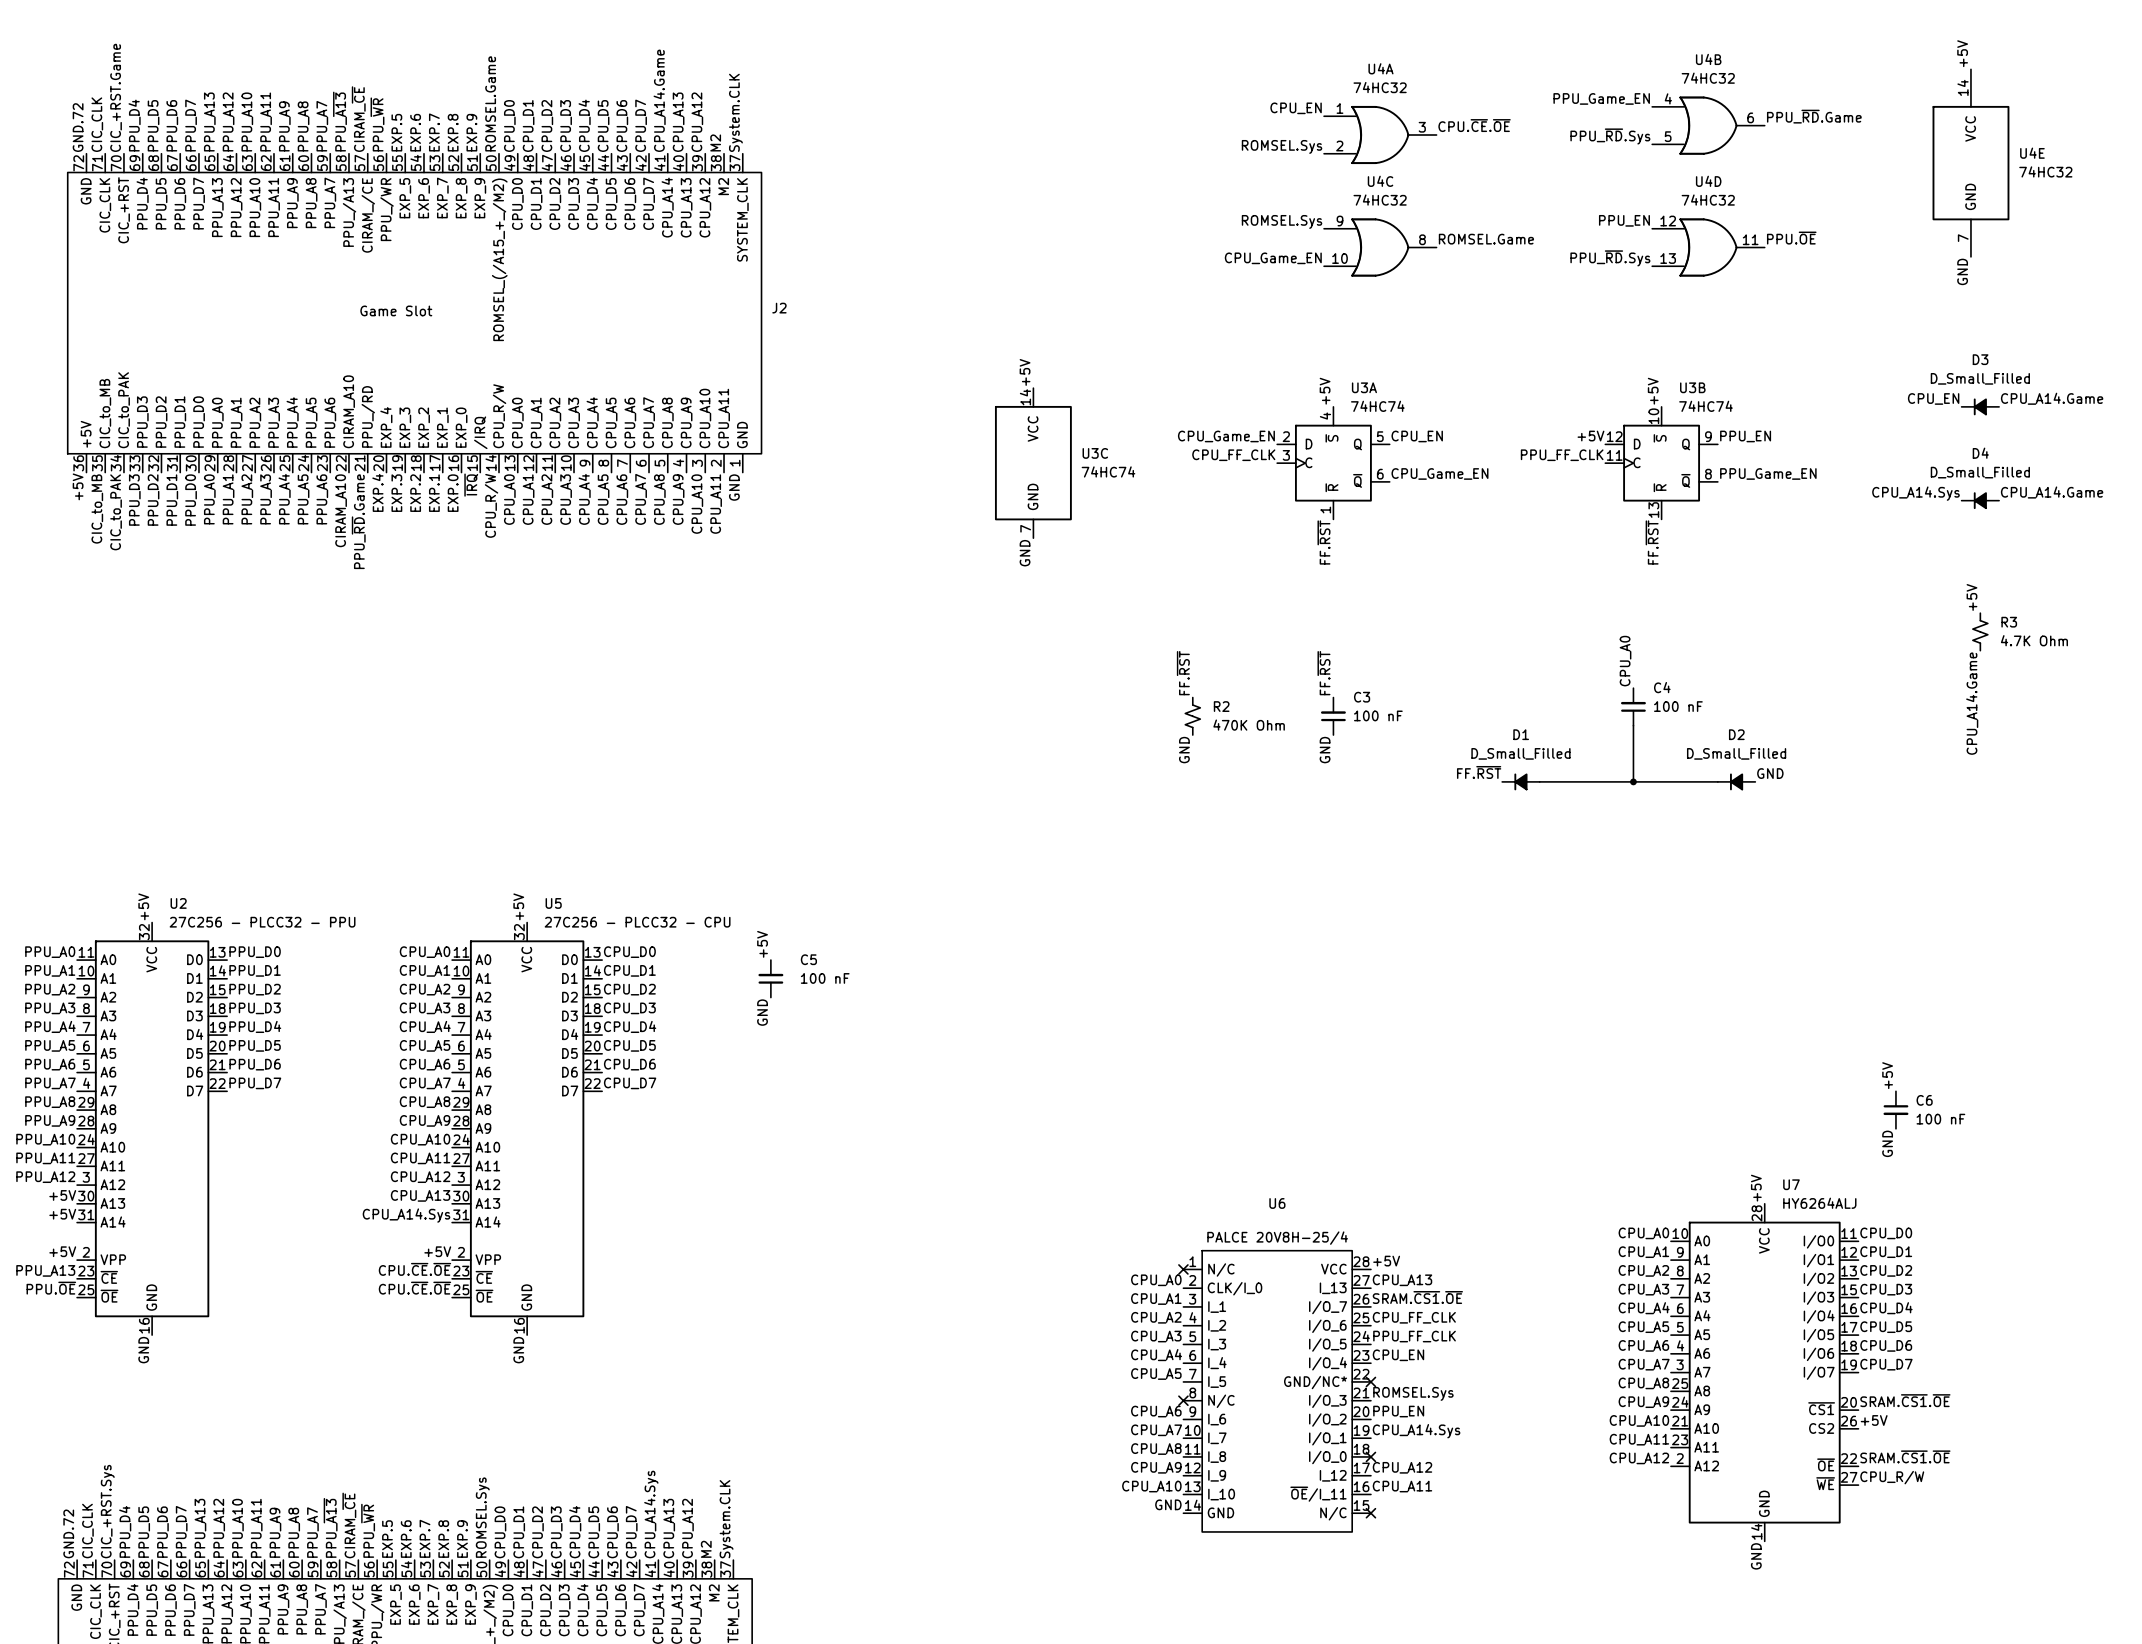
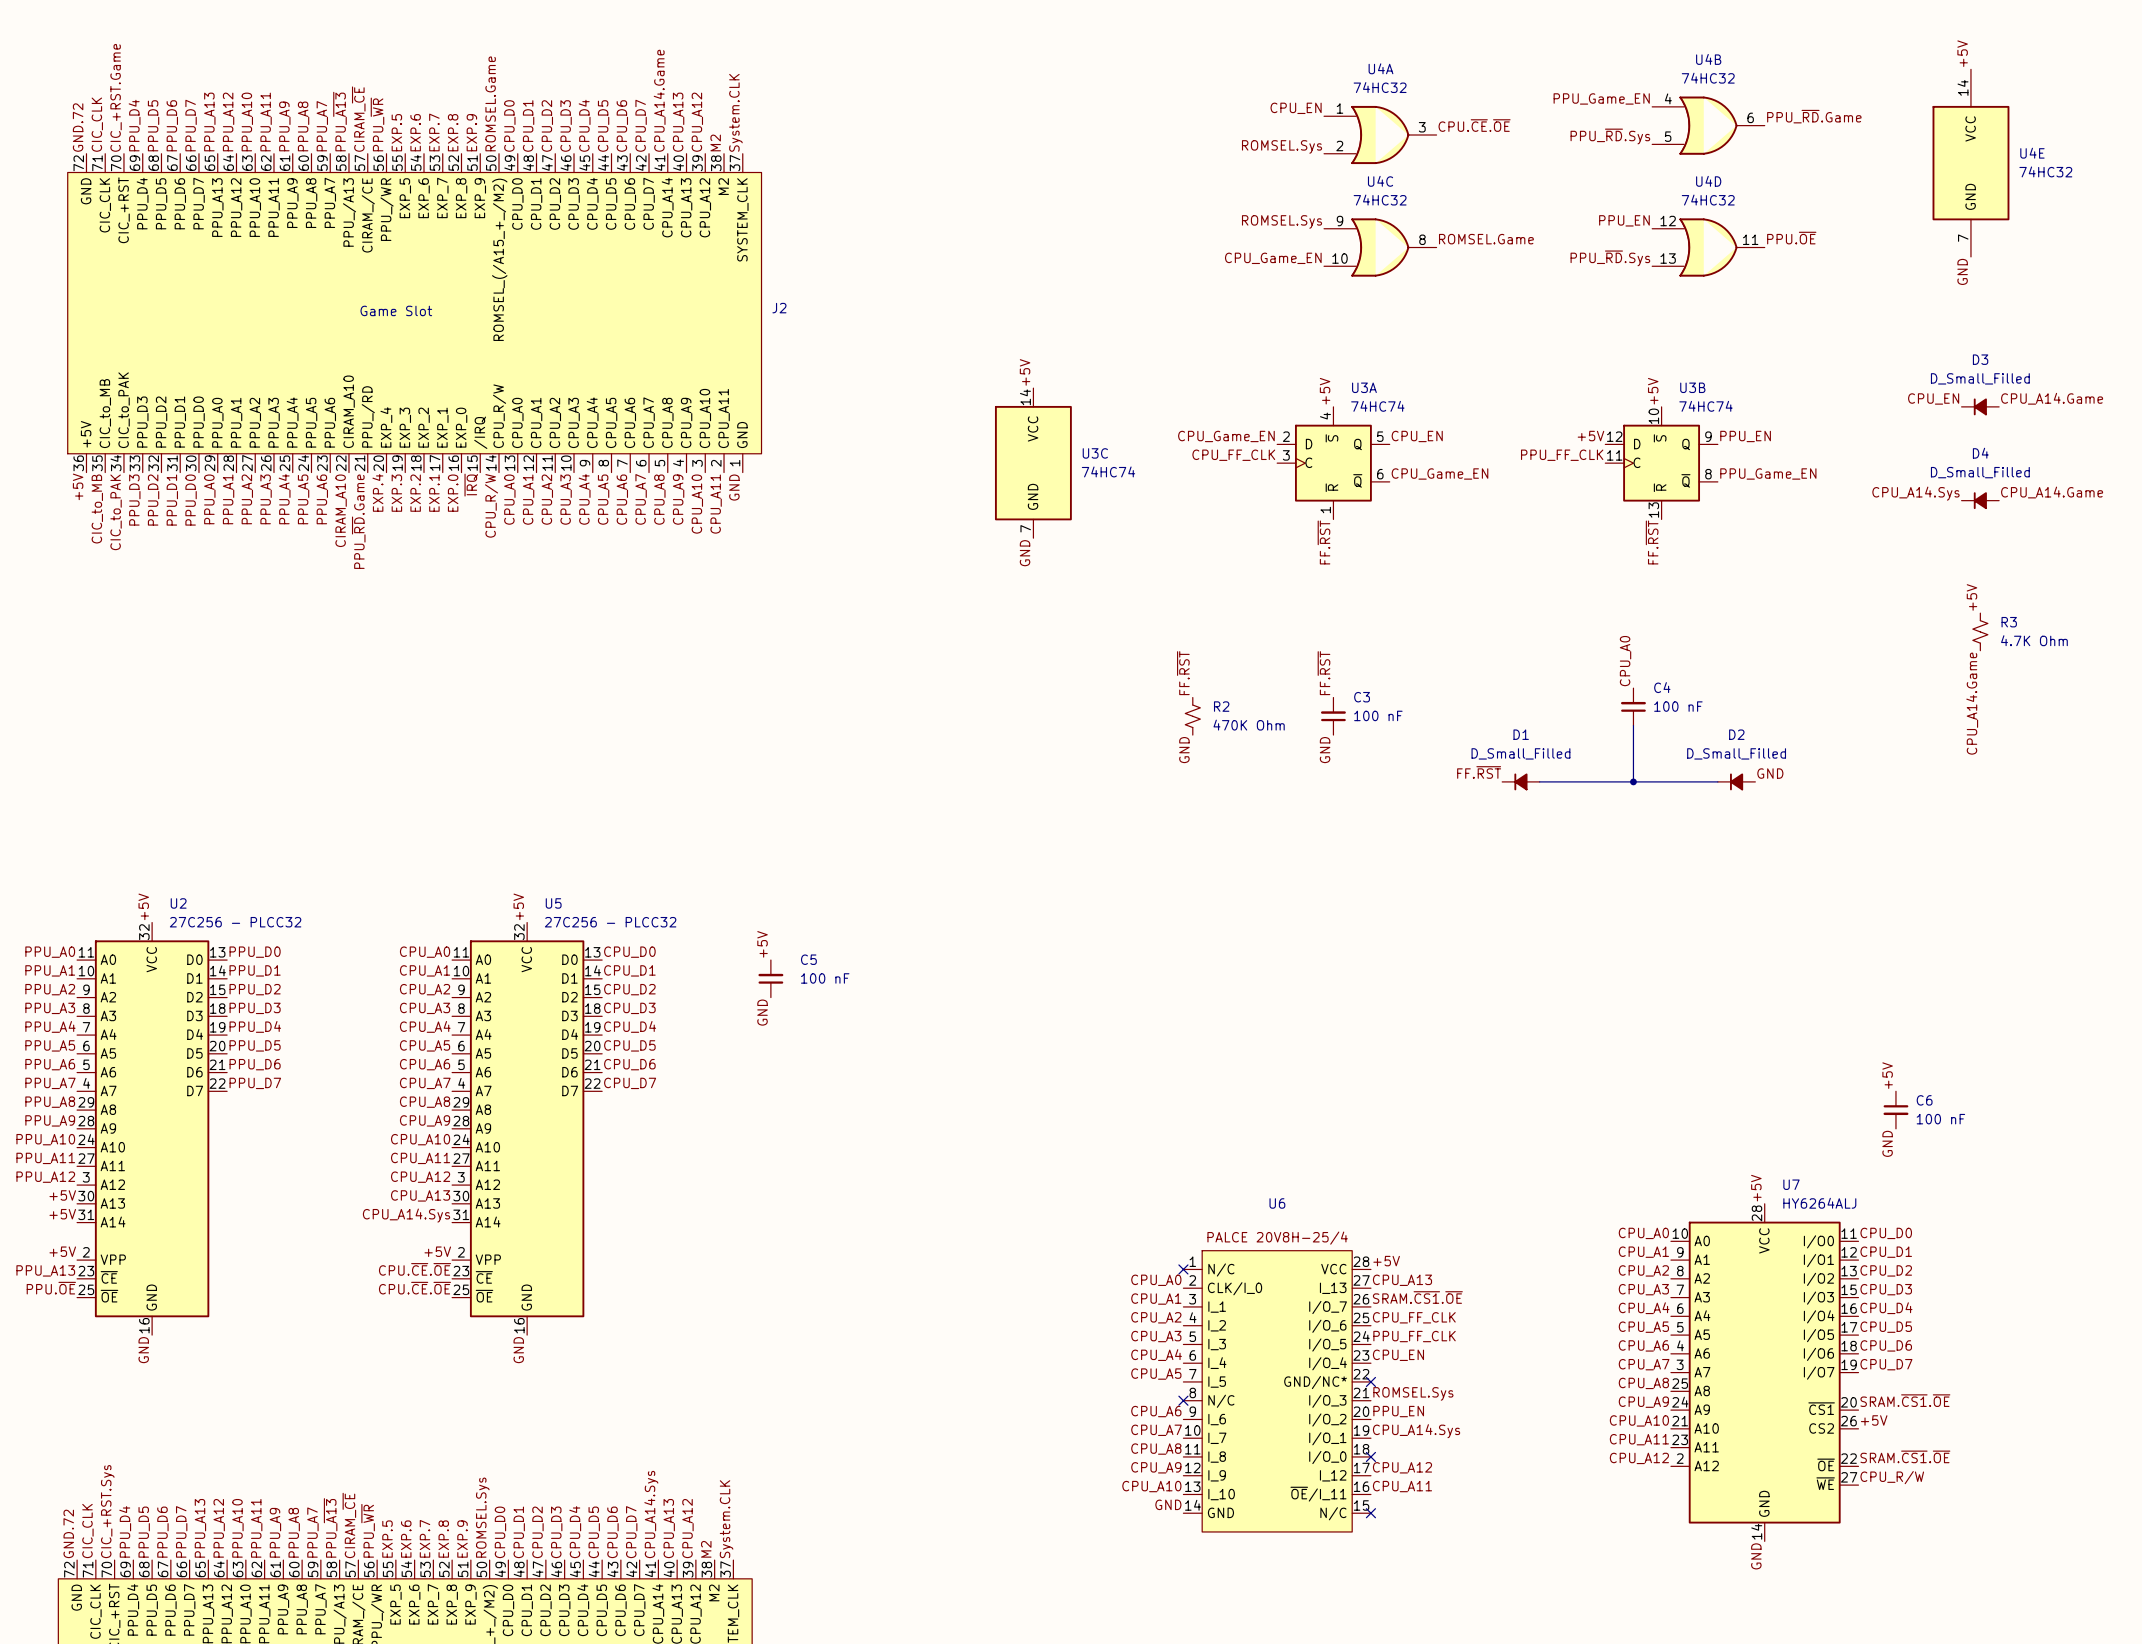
U2 value: 27C256 - PLCC32 - PPU (262, 922) -> 27C256 - PLCC32 (235, 922)
U5 value: 27C256 - PLCC32 - CPU (637, 922) -> 27C256 - PLCC32 (610, 922)

